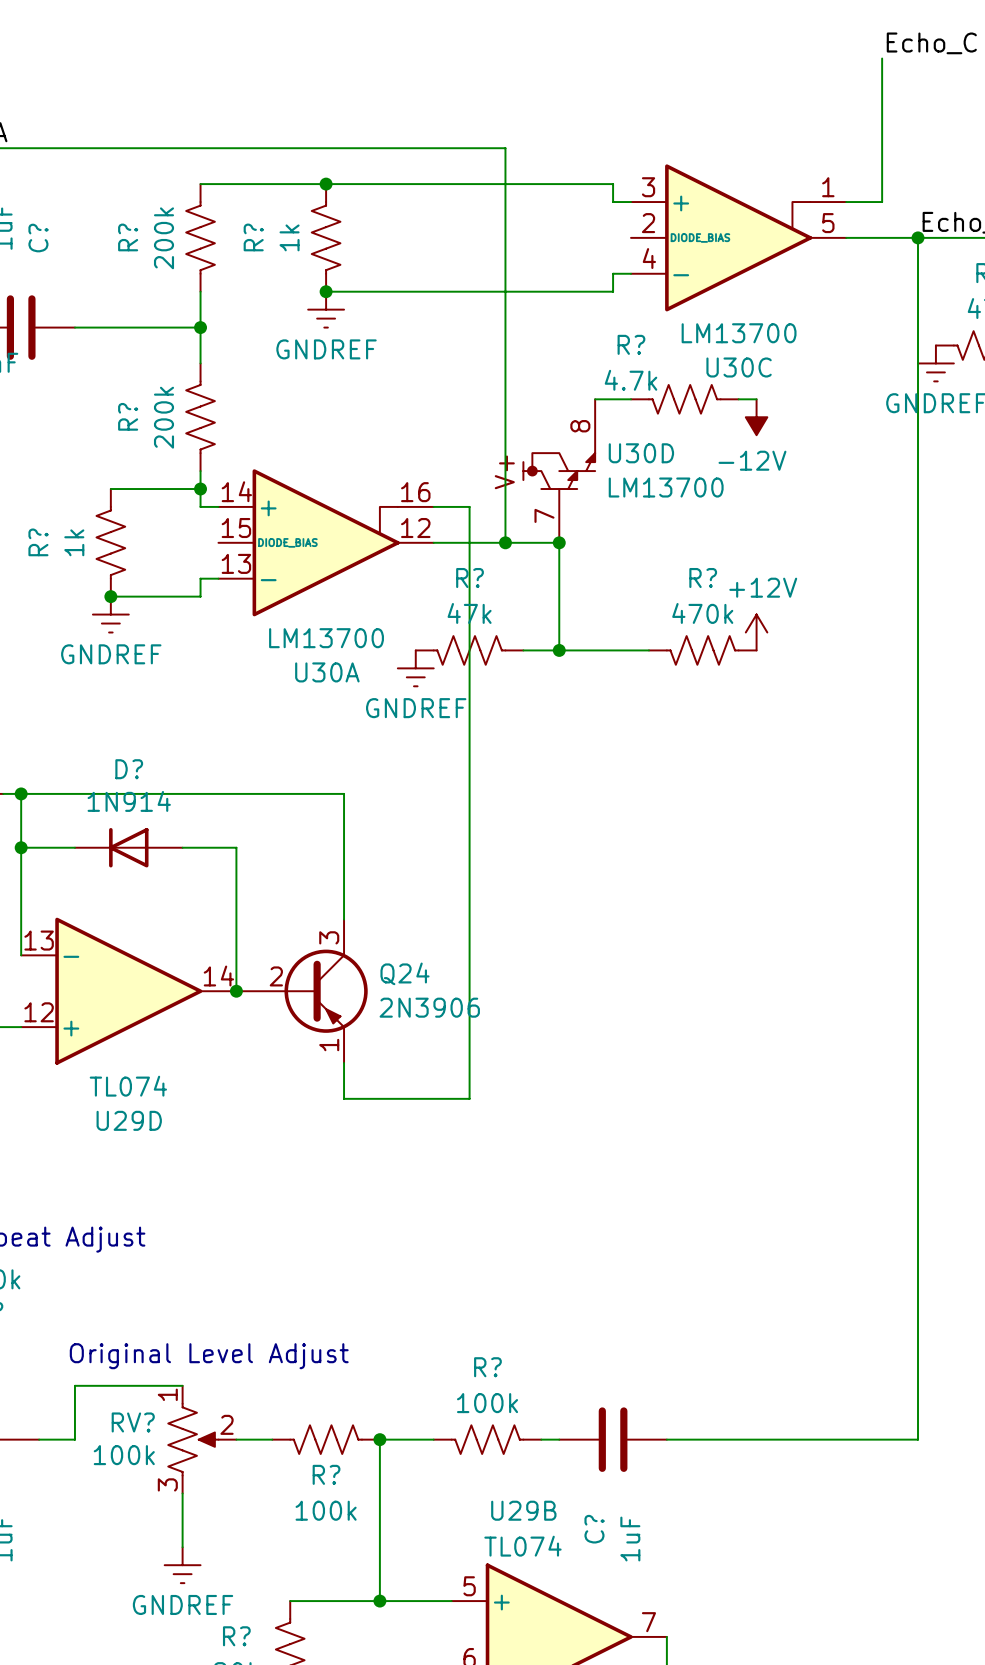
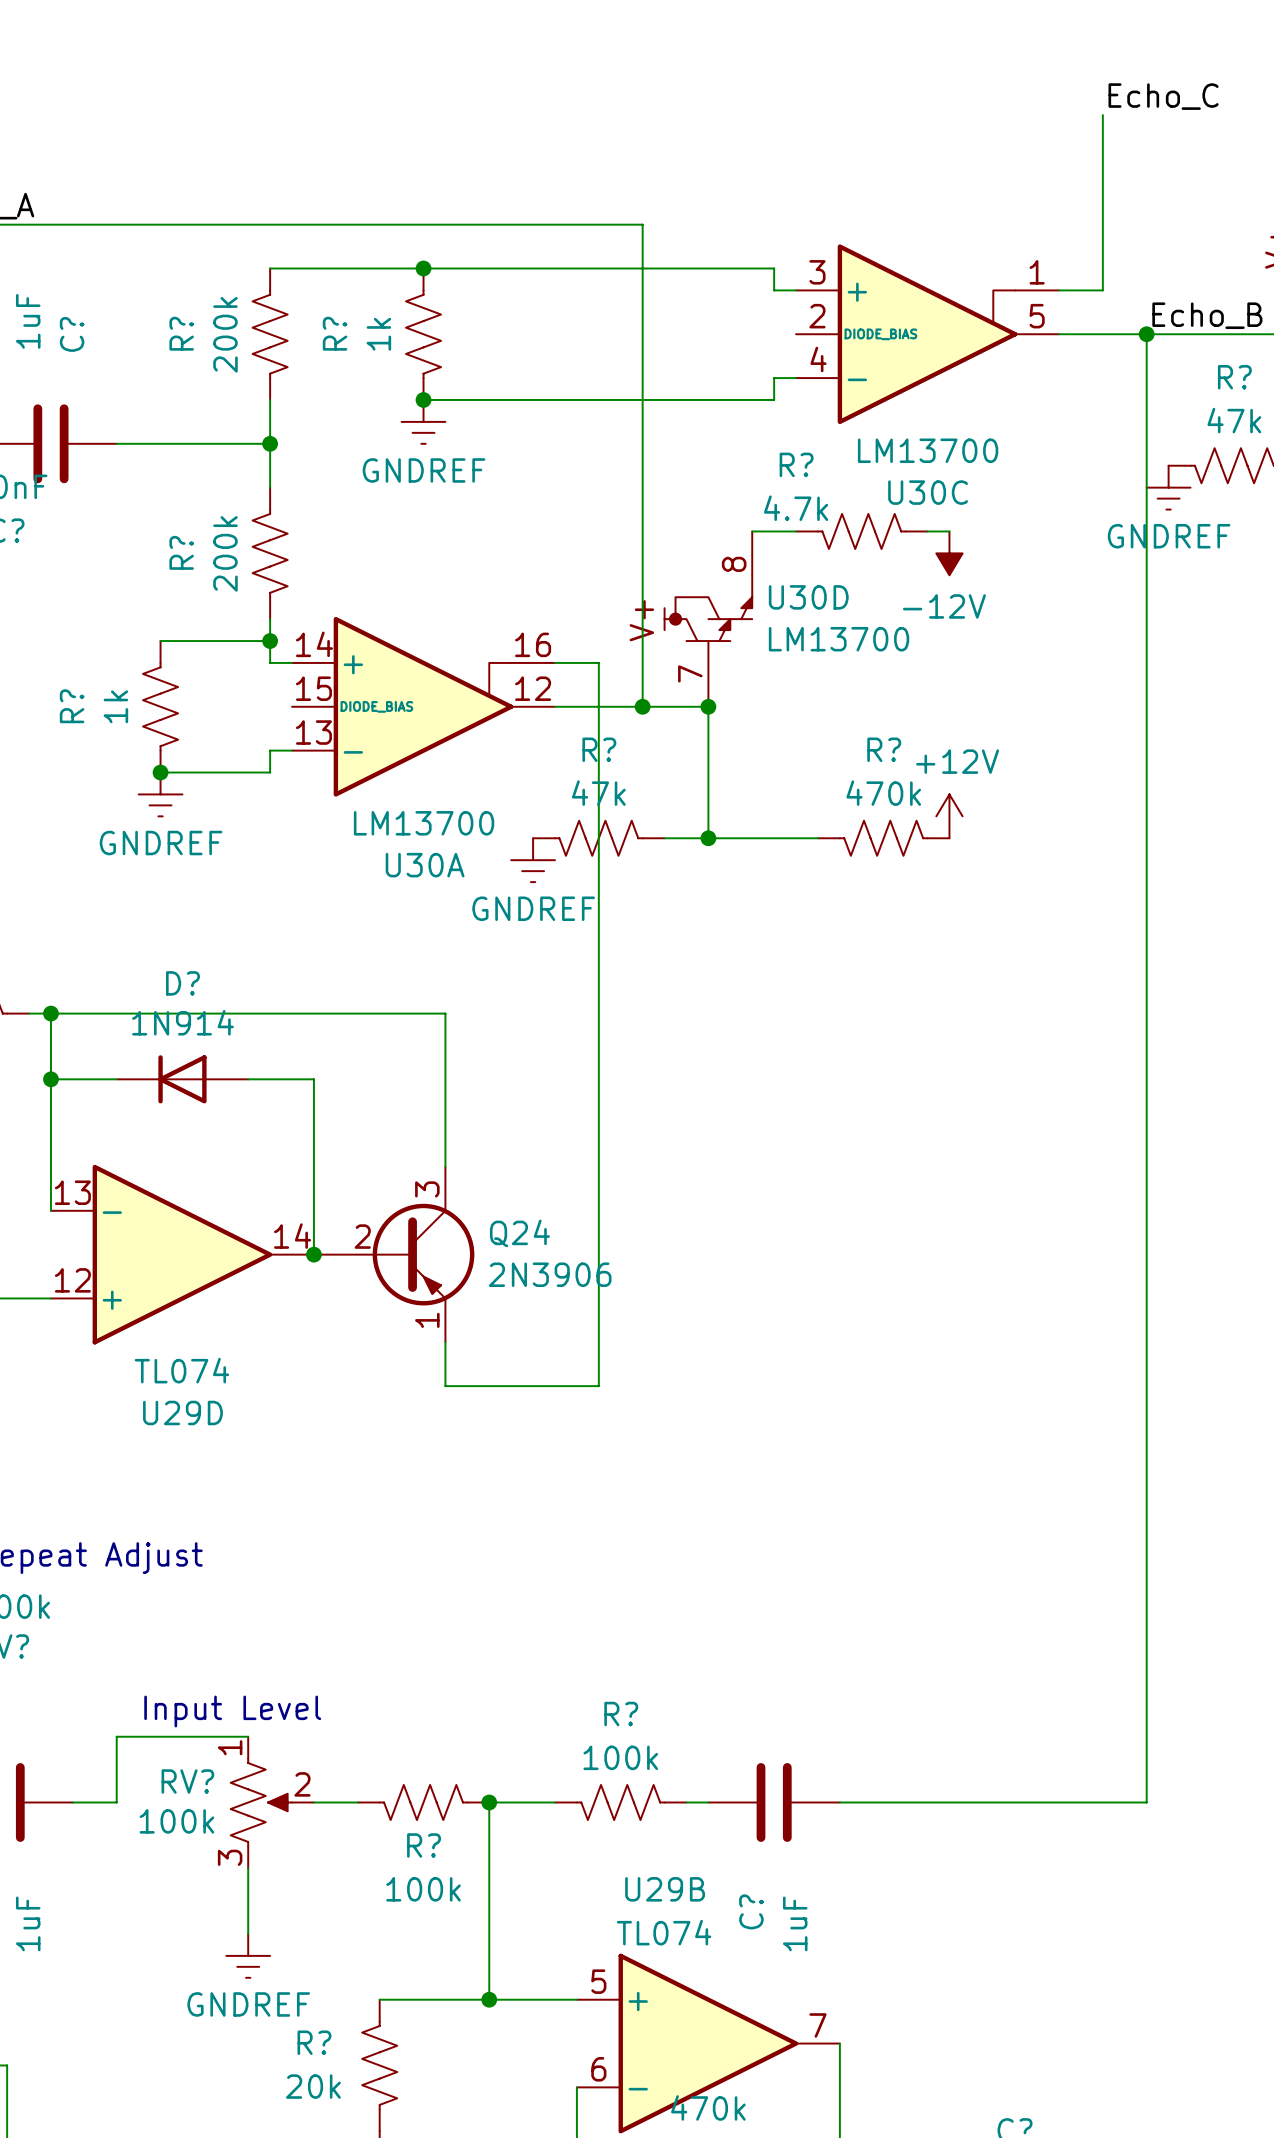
text: Original Level Adjust (209, 1356) -> none
text: none -> Input Level (232, 1711)

